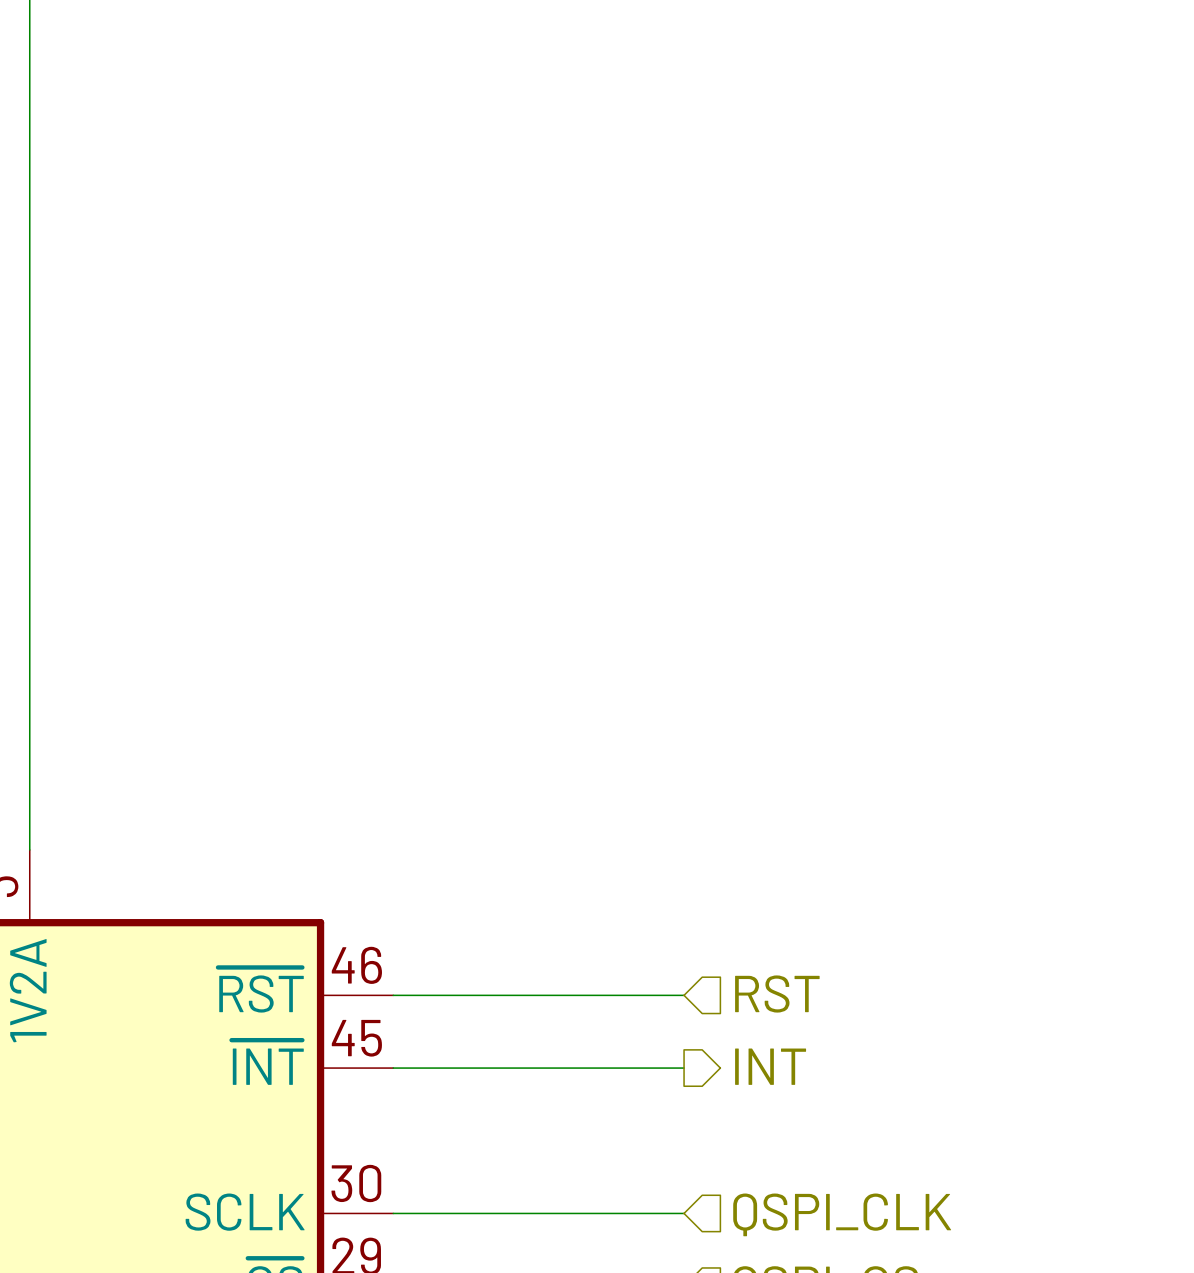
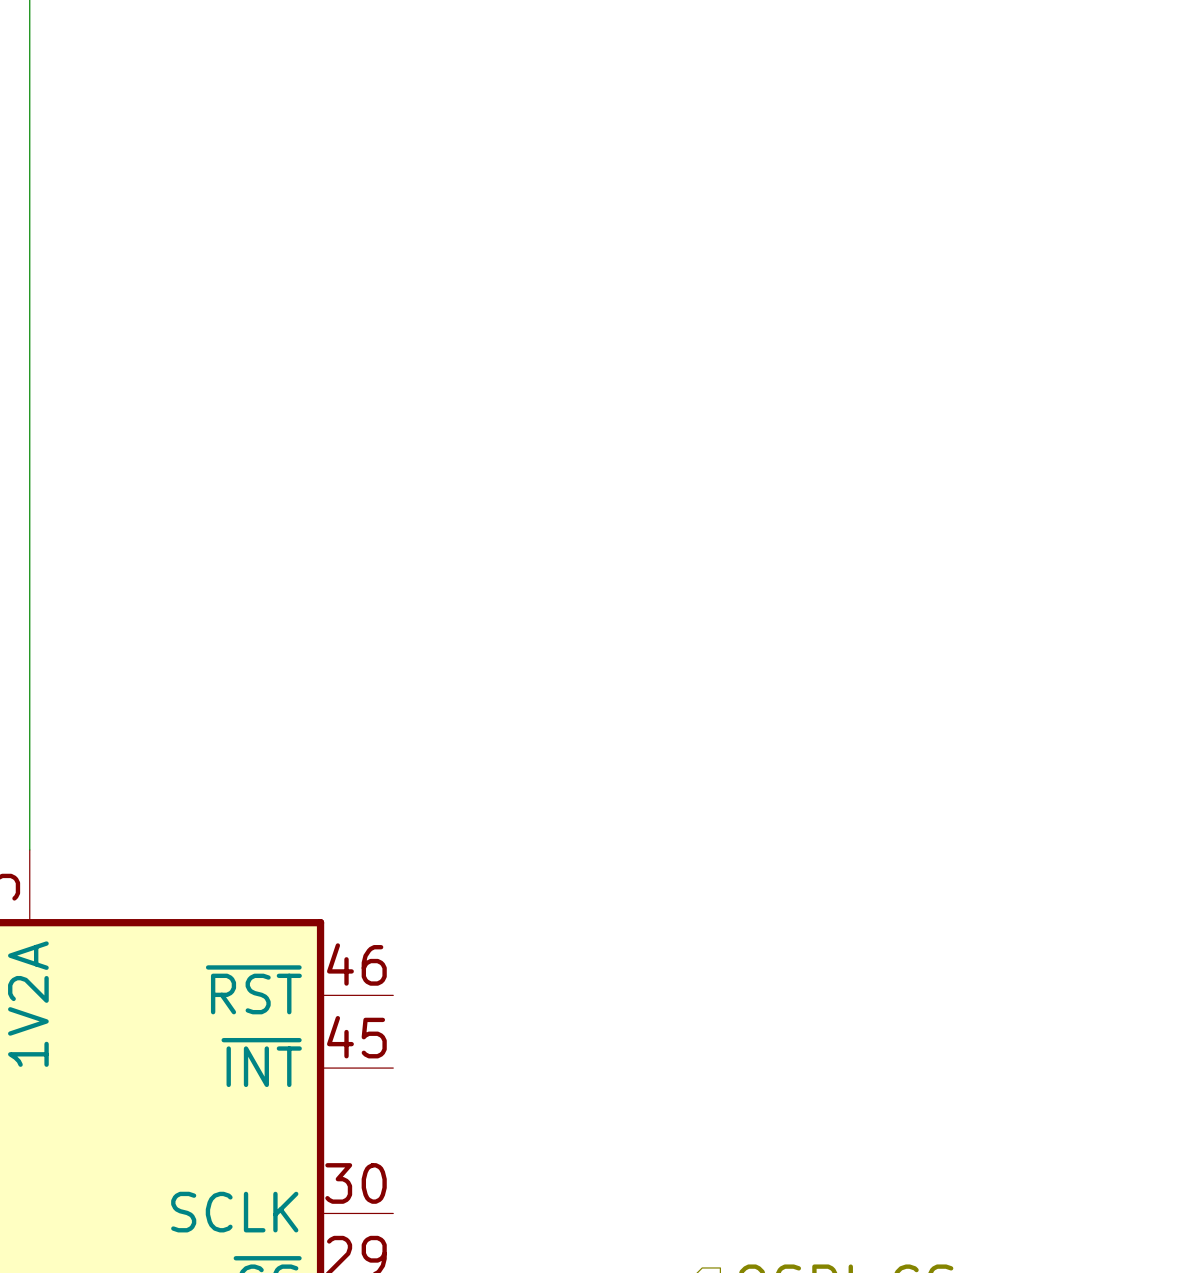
hierarchical label: RST (777, 994) -> none
wire: (393, 995) (684, 995) -> none
hierarchical label: INT (770, 1066) -> none
wire: (393, 1068) (684, 1068) -> none
wire: (393, 1213) (684, 1213) -> none
hierarchical label: QSPI_CLK (842, 1214) -> none

